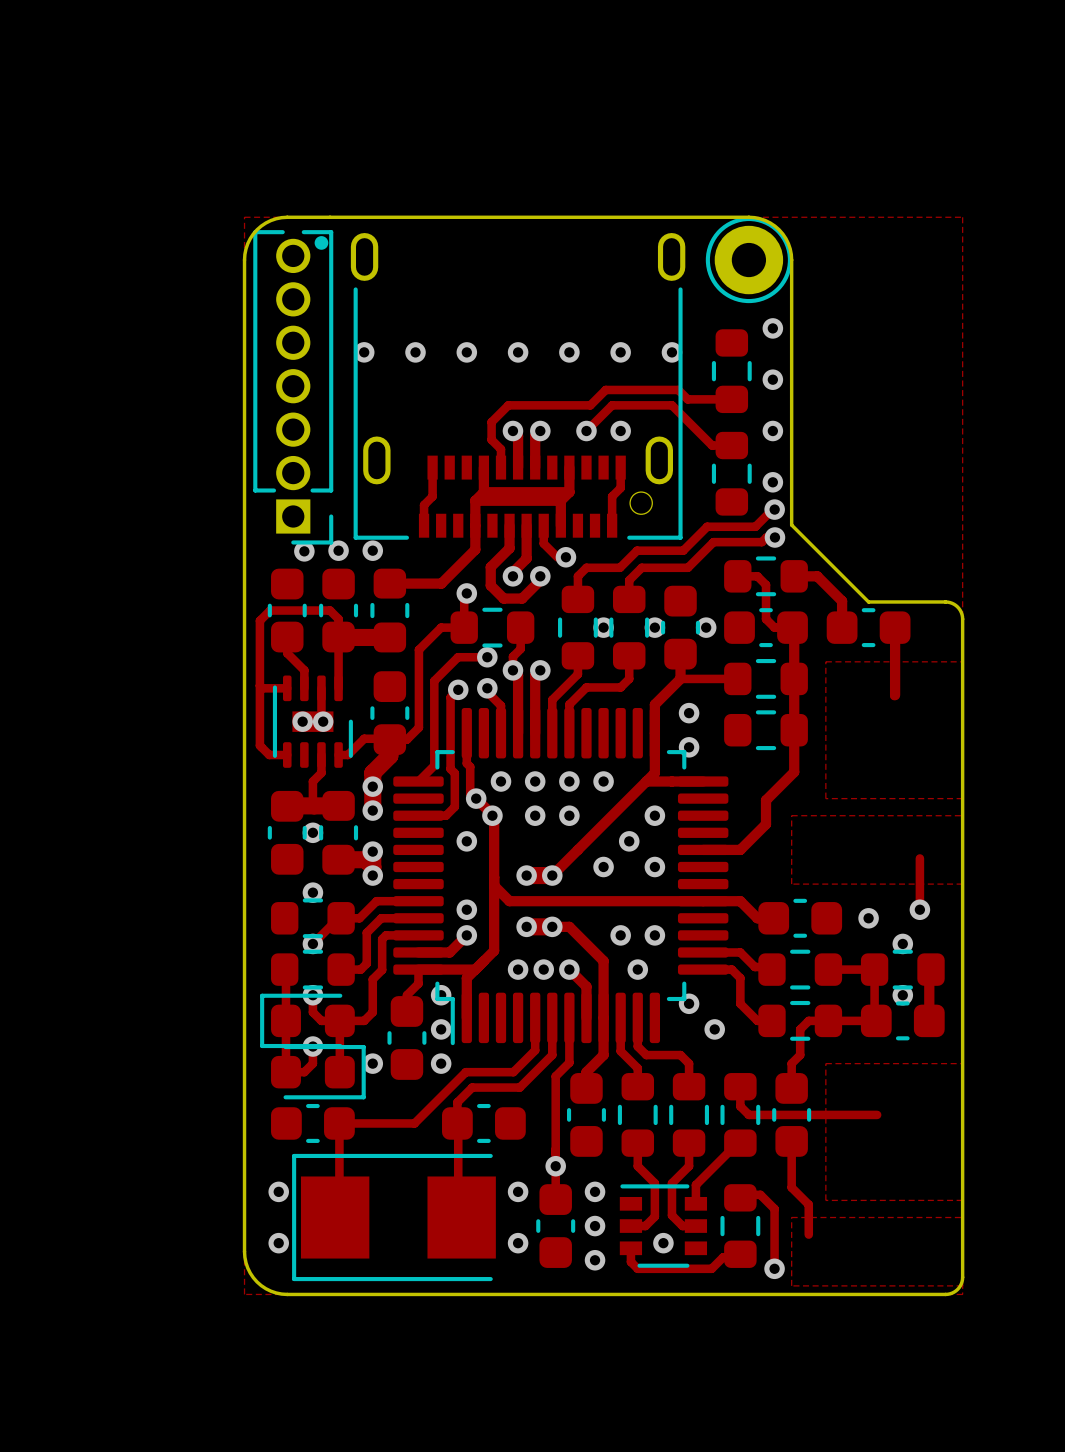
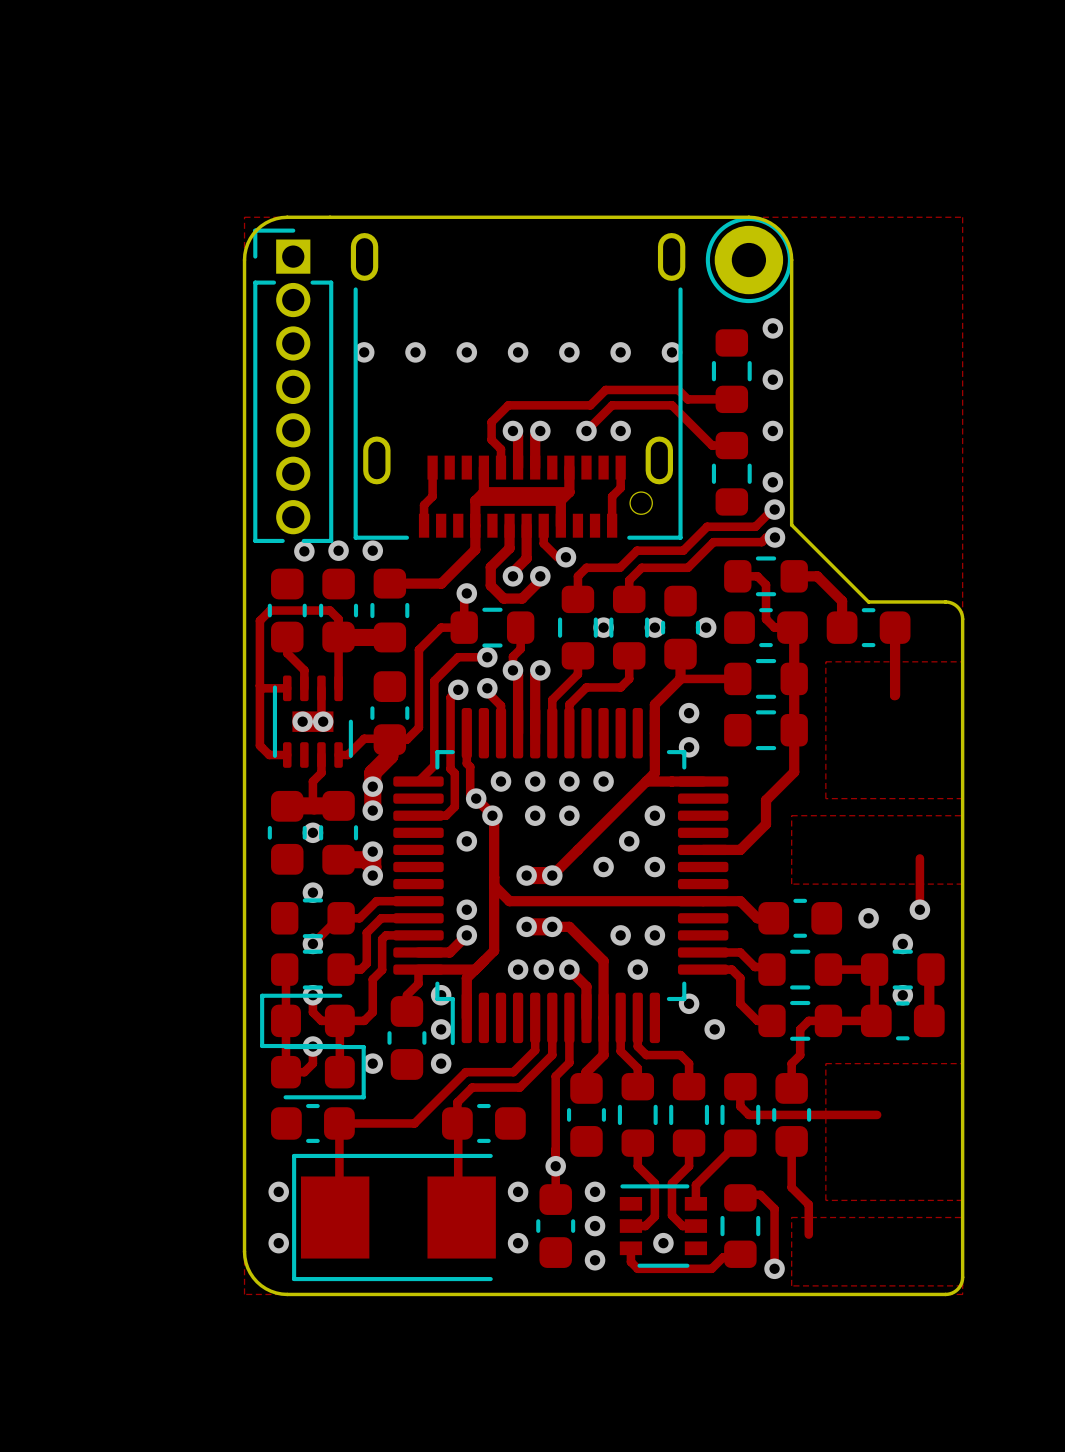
drawing: [314, 236, 329, 250] -> none
part rotation: 0° (293, 387) -> 180° (293, 385)

